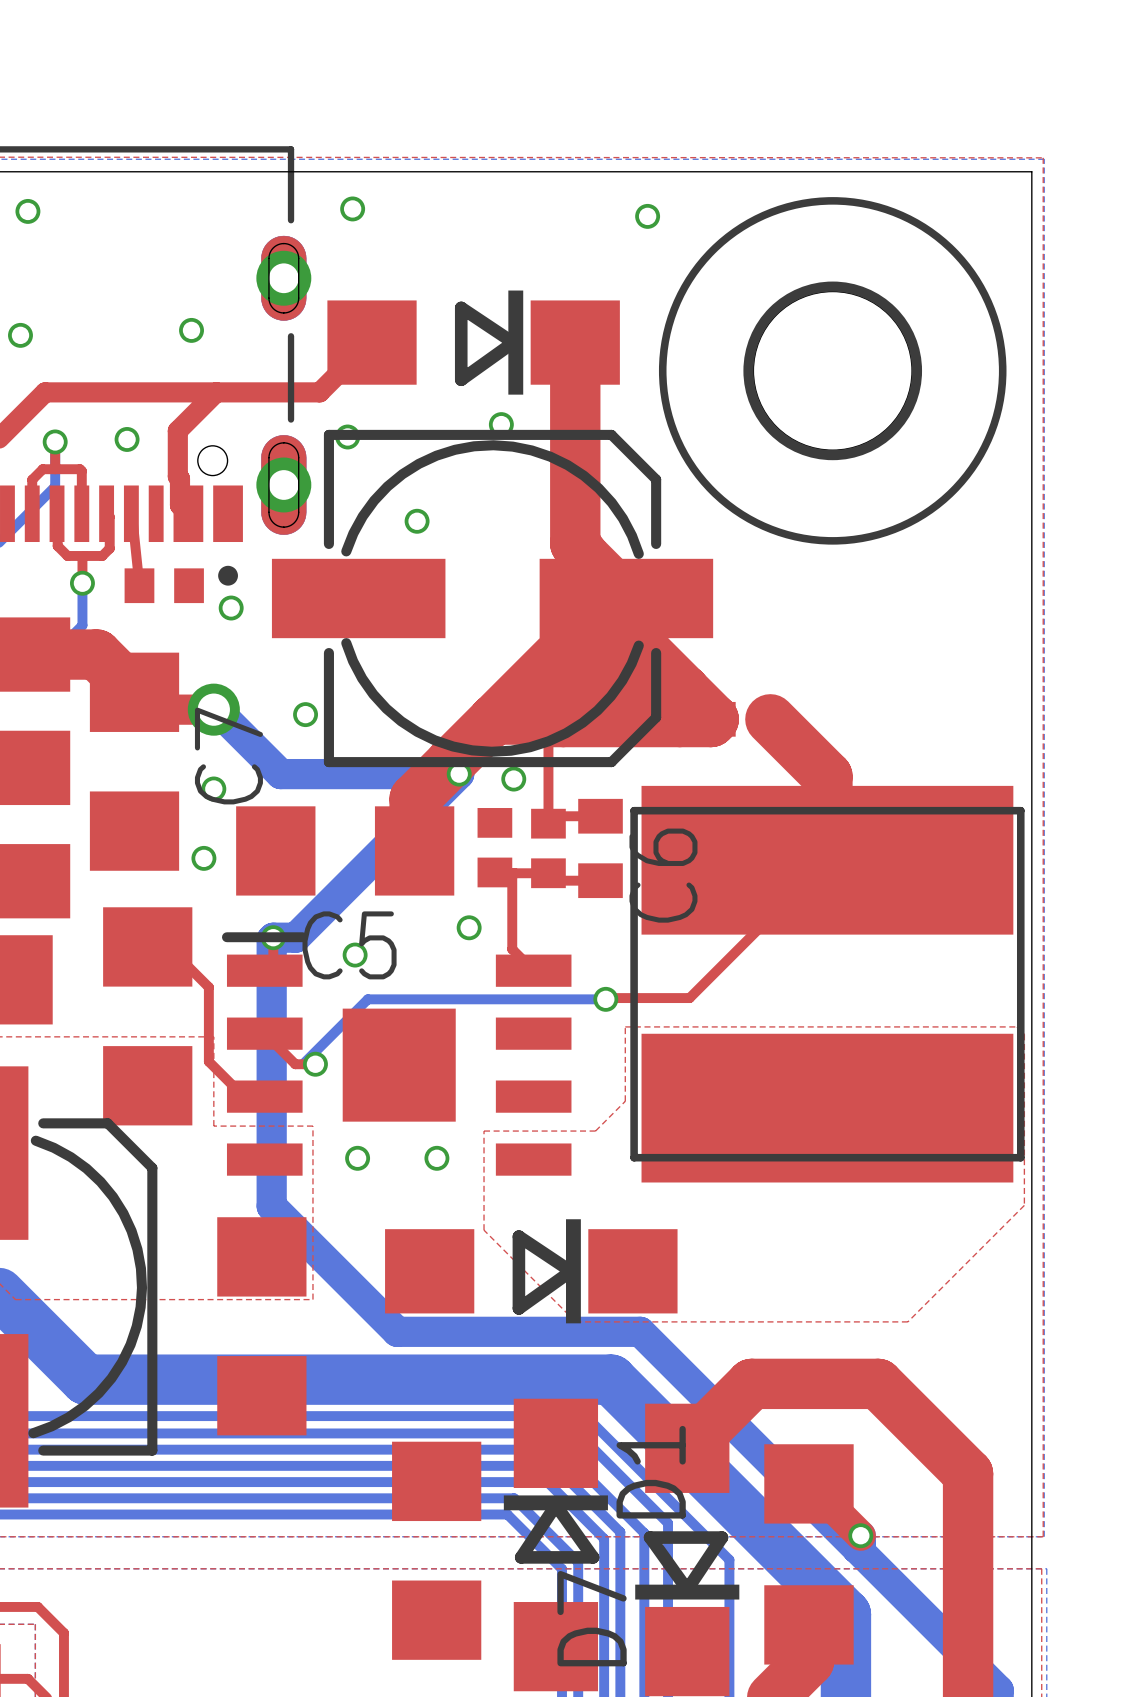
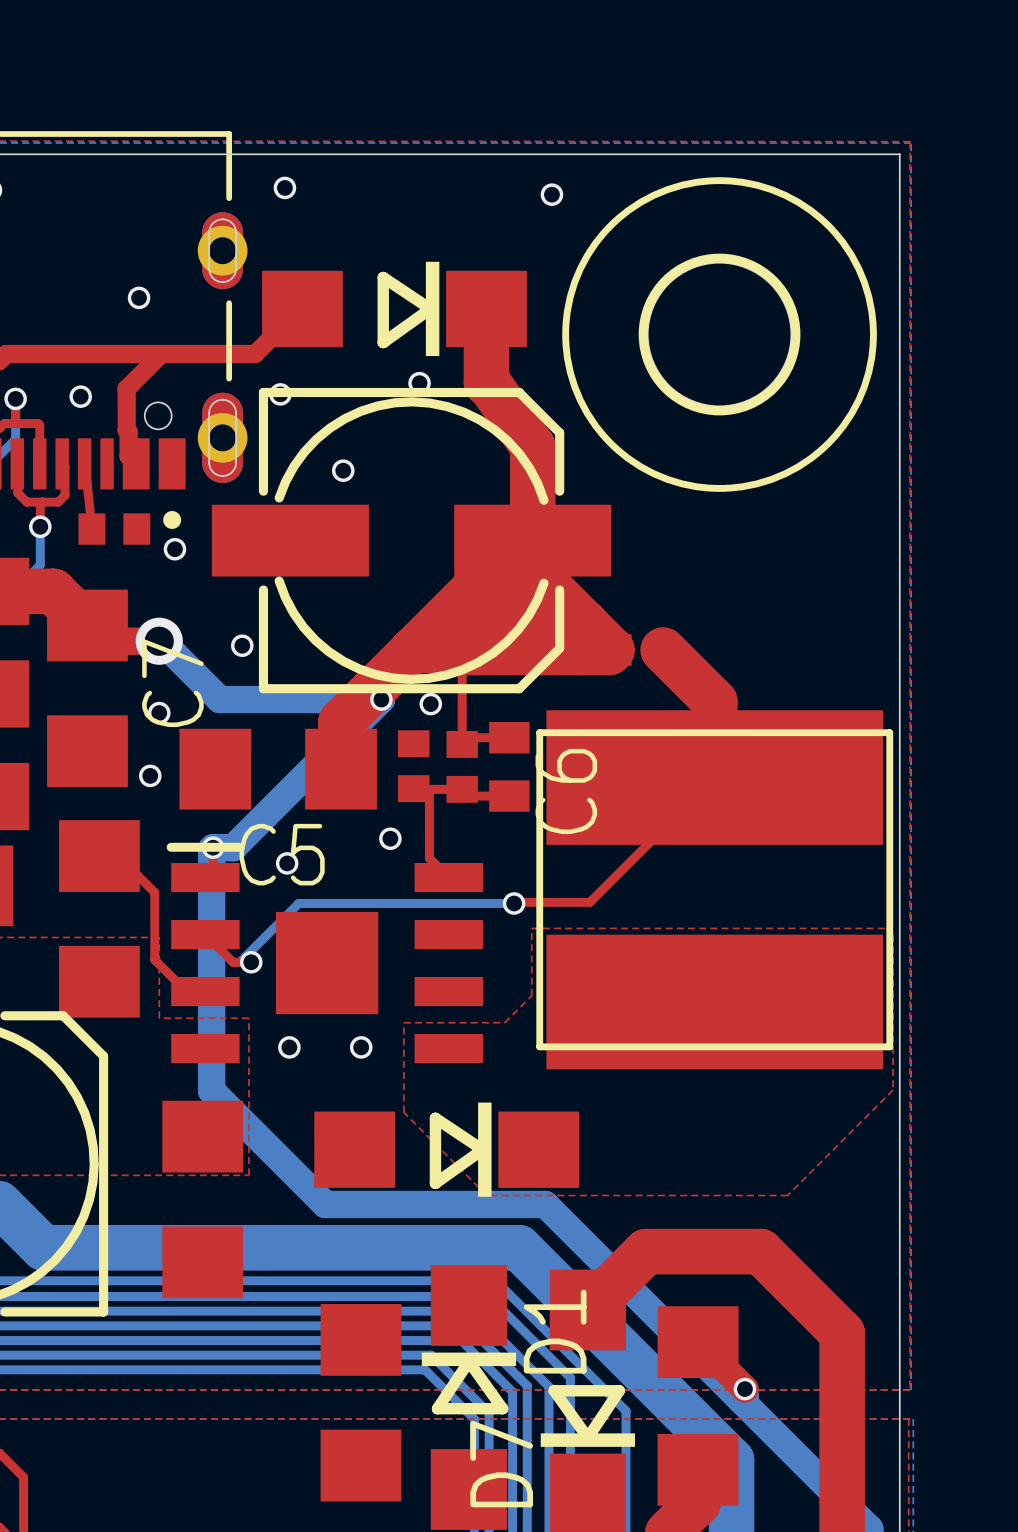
top track: (575, 424) (575, 543) (583, 555) (626, 598) -> (486, 382) (487, 381) (532, 446) (532, 540)

